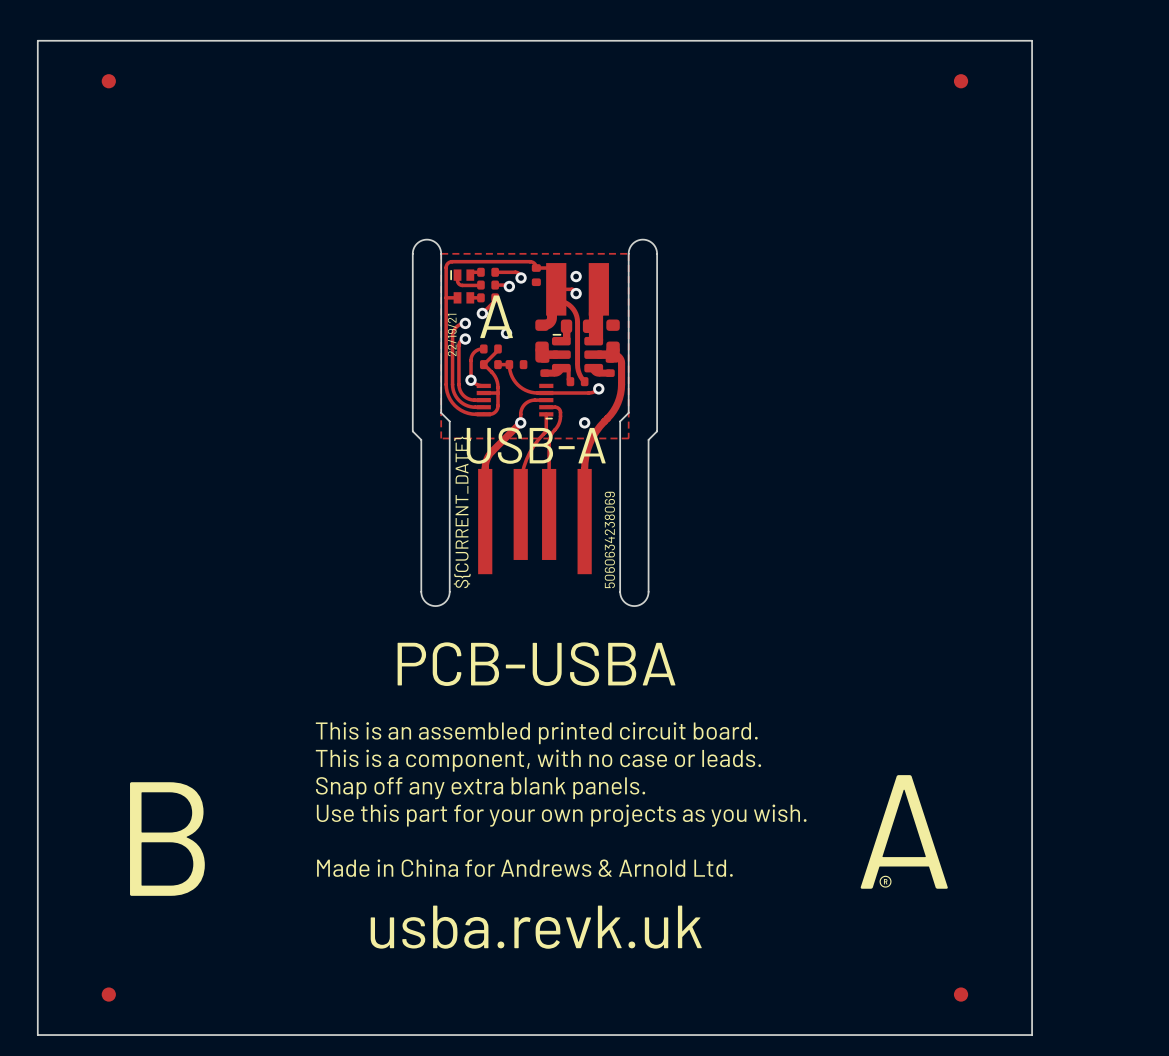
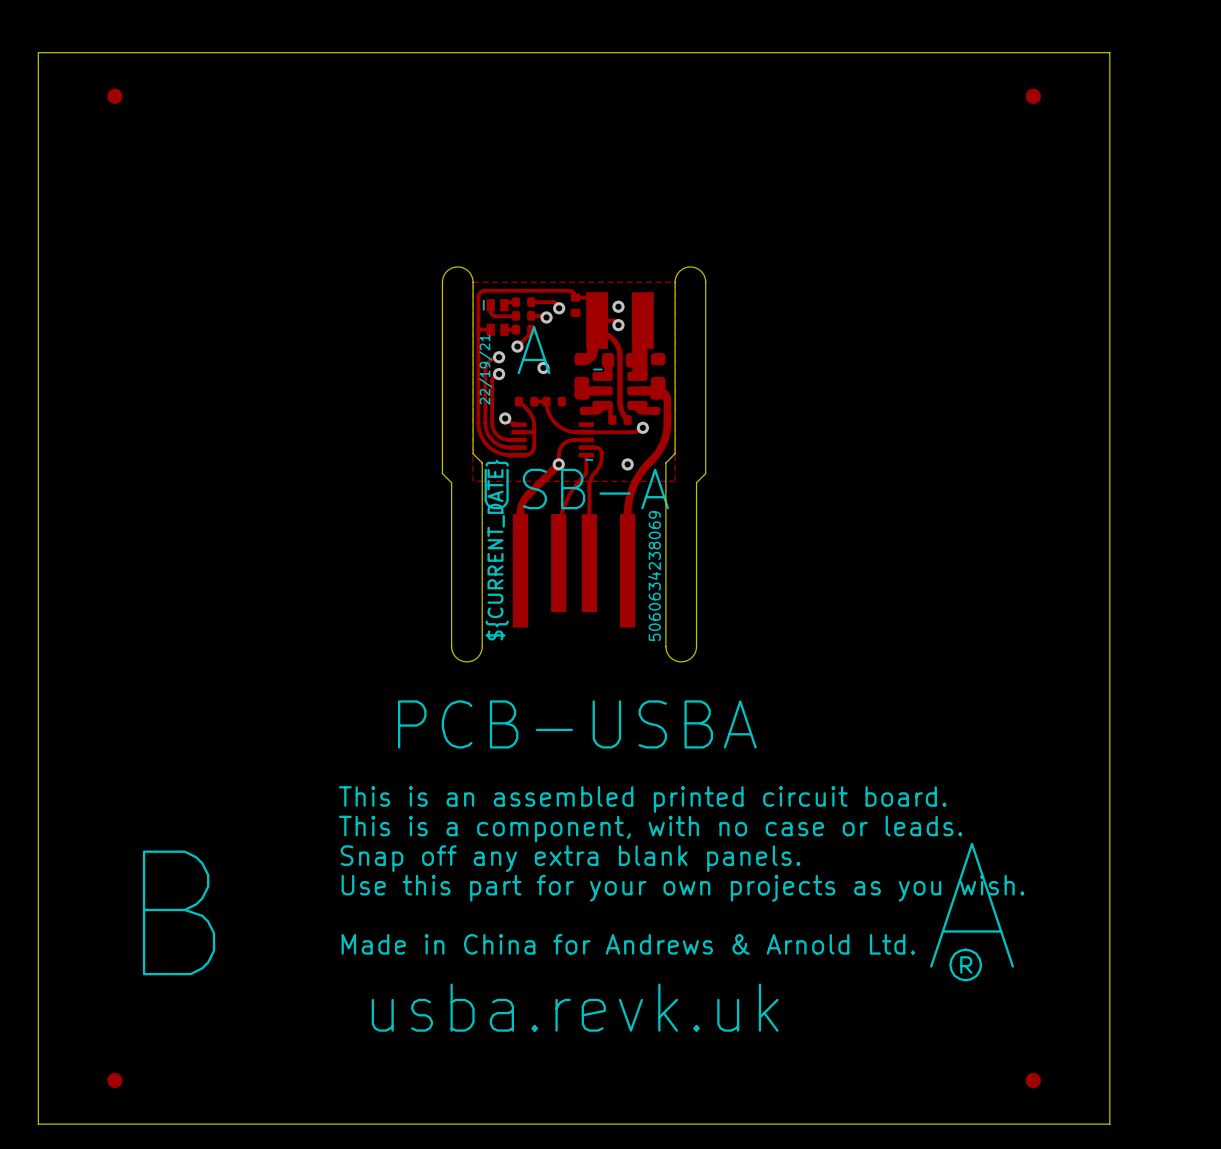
track: (483, 348) (476, 350) (471, 356) (471, 380) -> none
part: (490, 348) -> none
track: (498, 348) (483, 364) -> none

